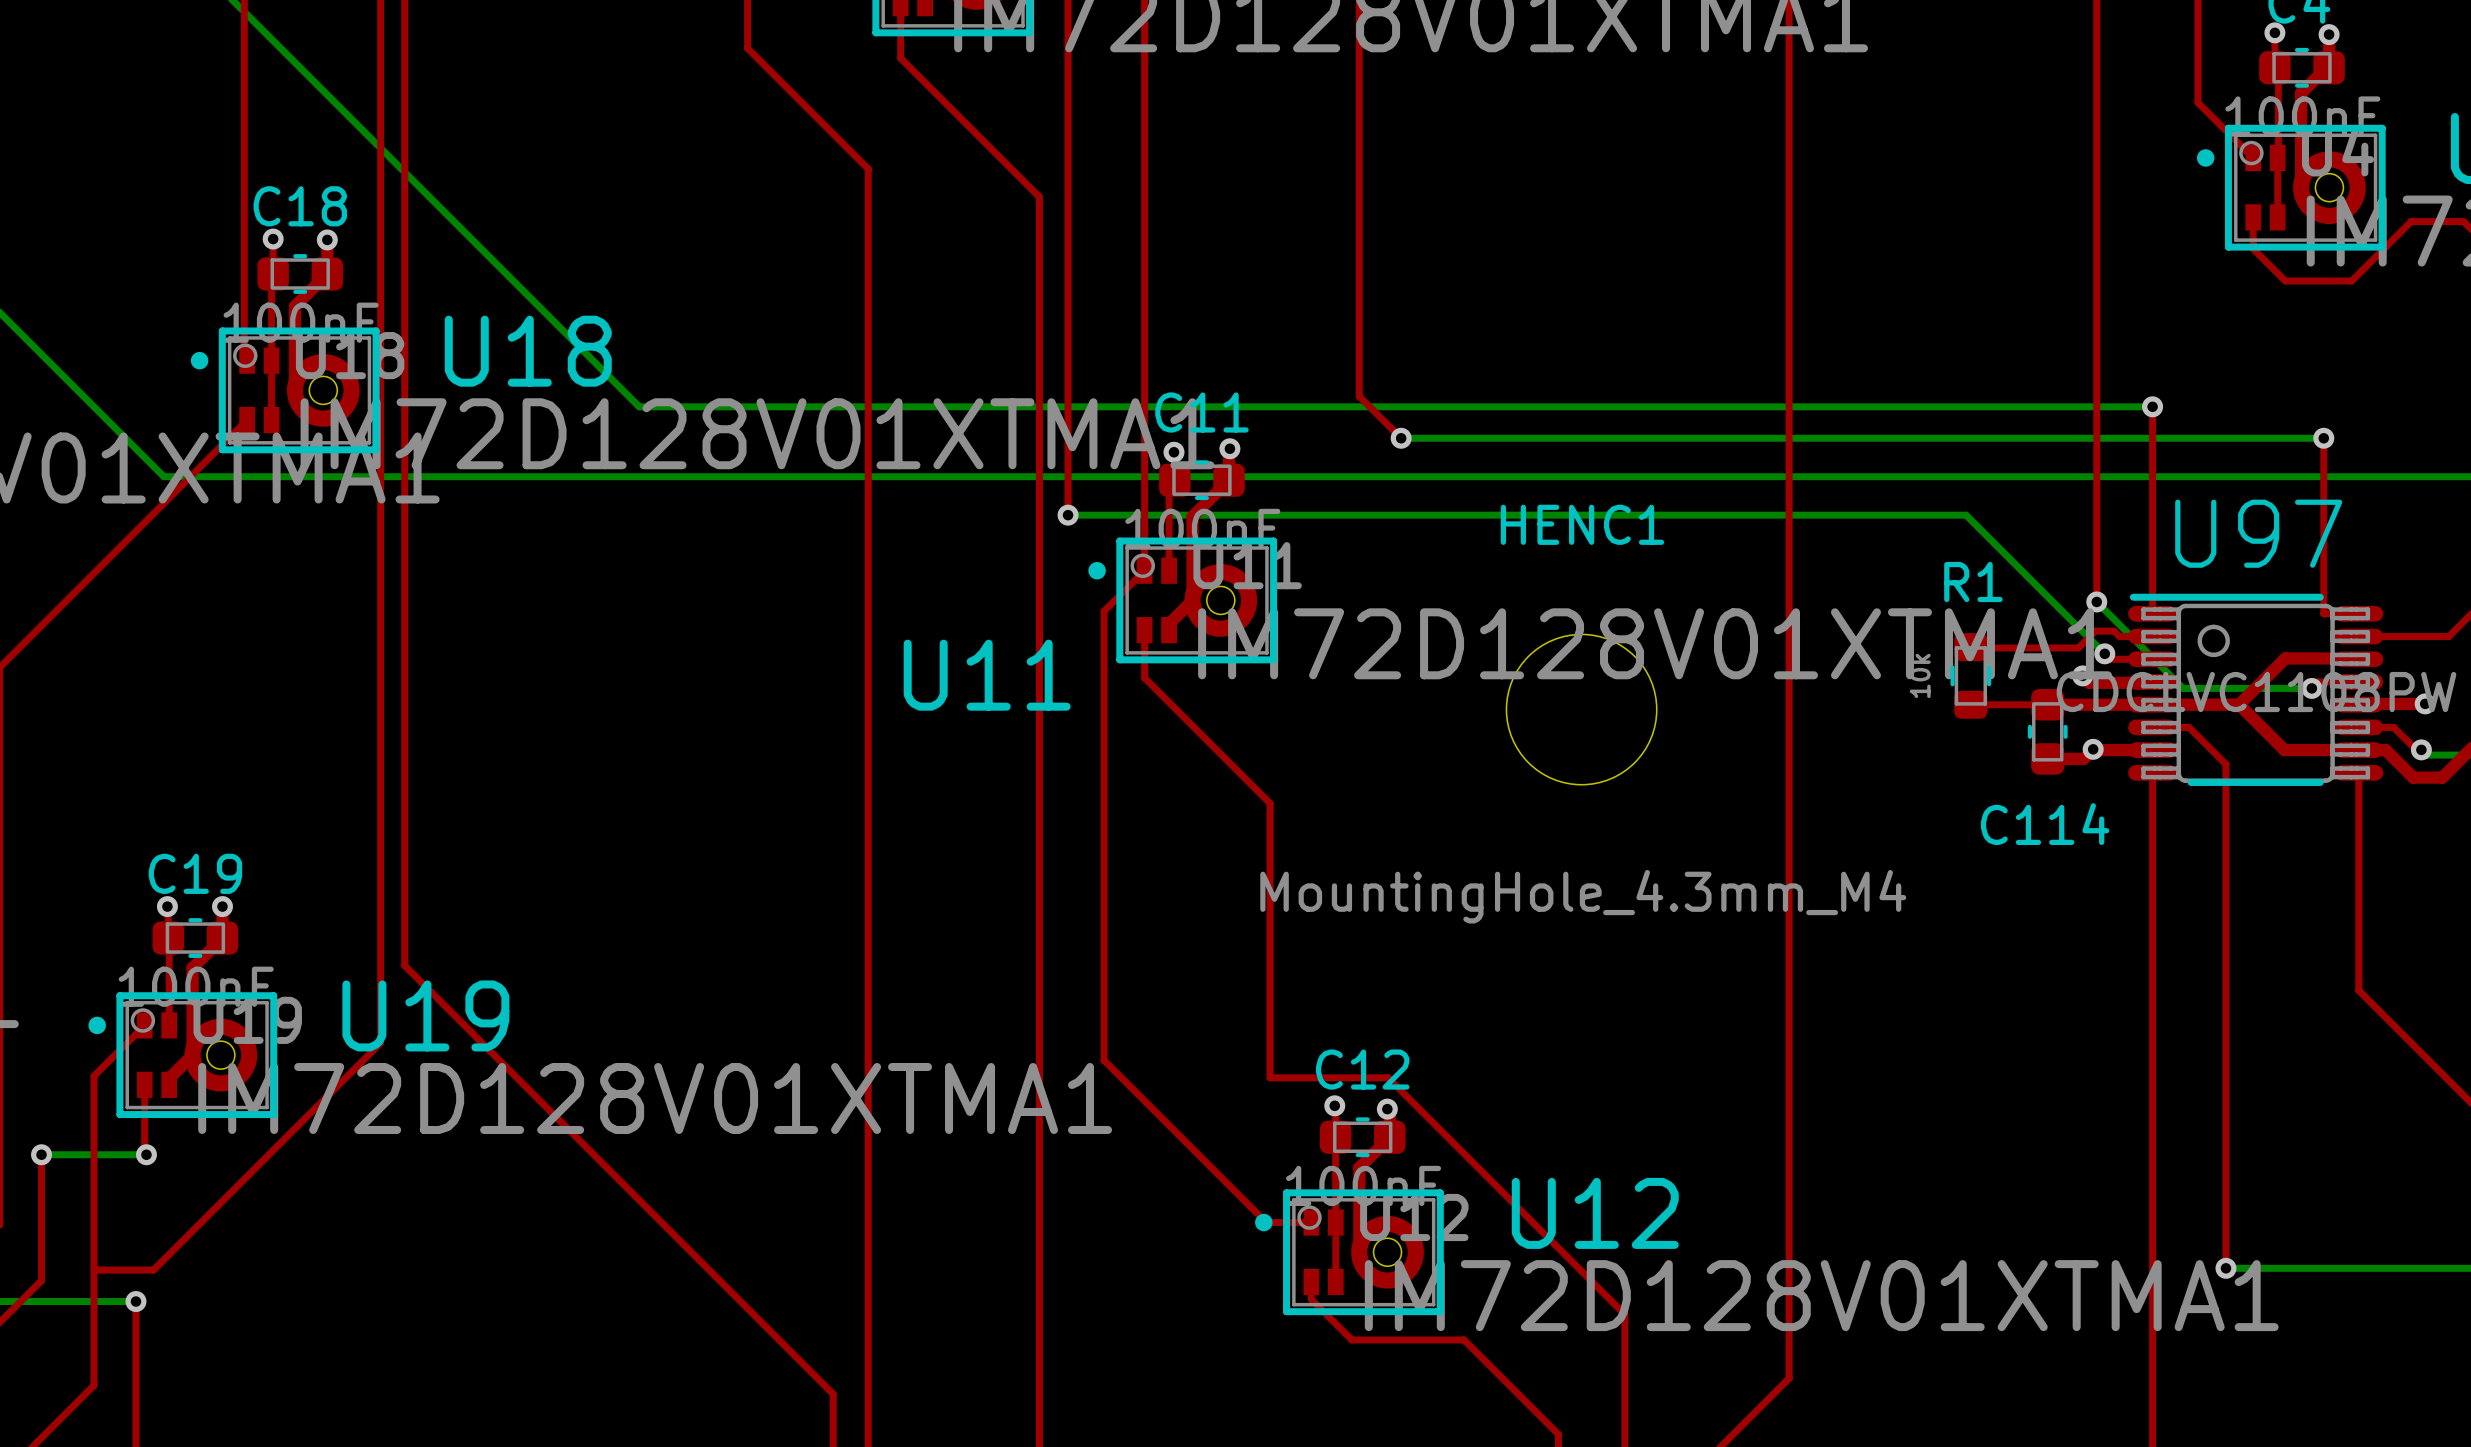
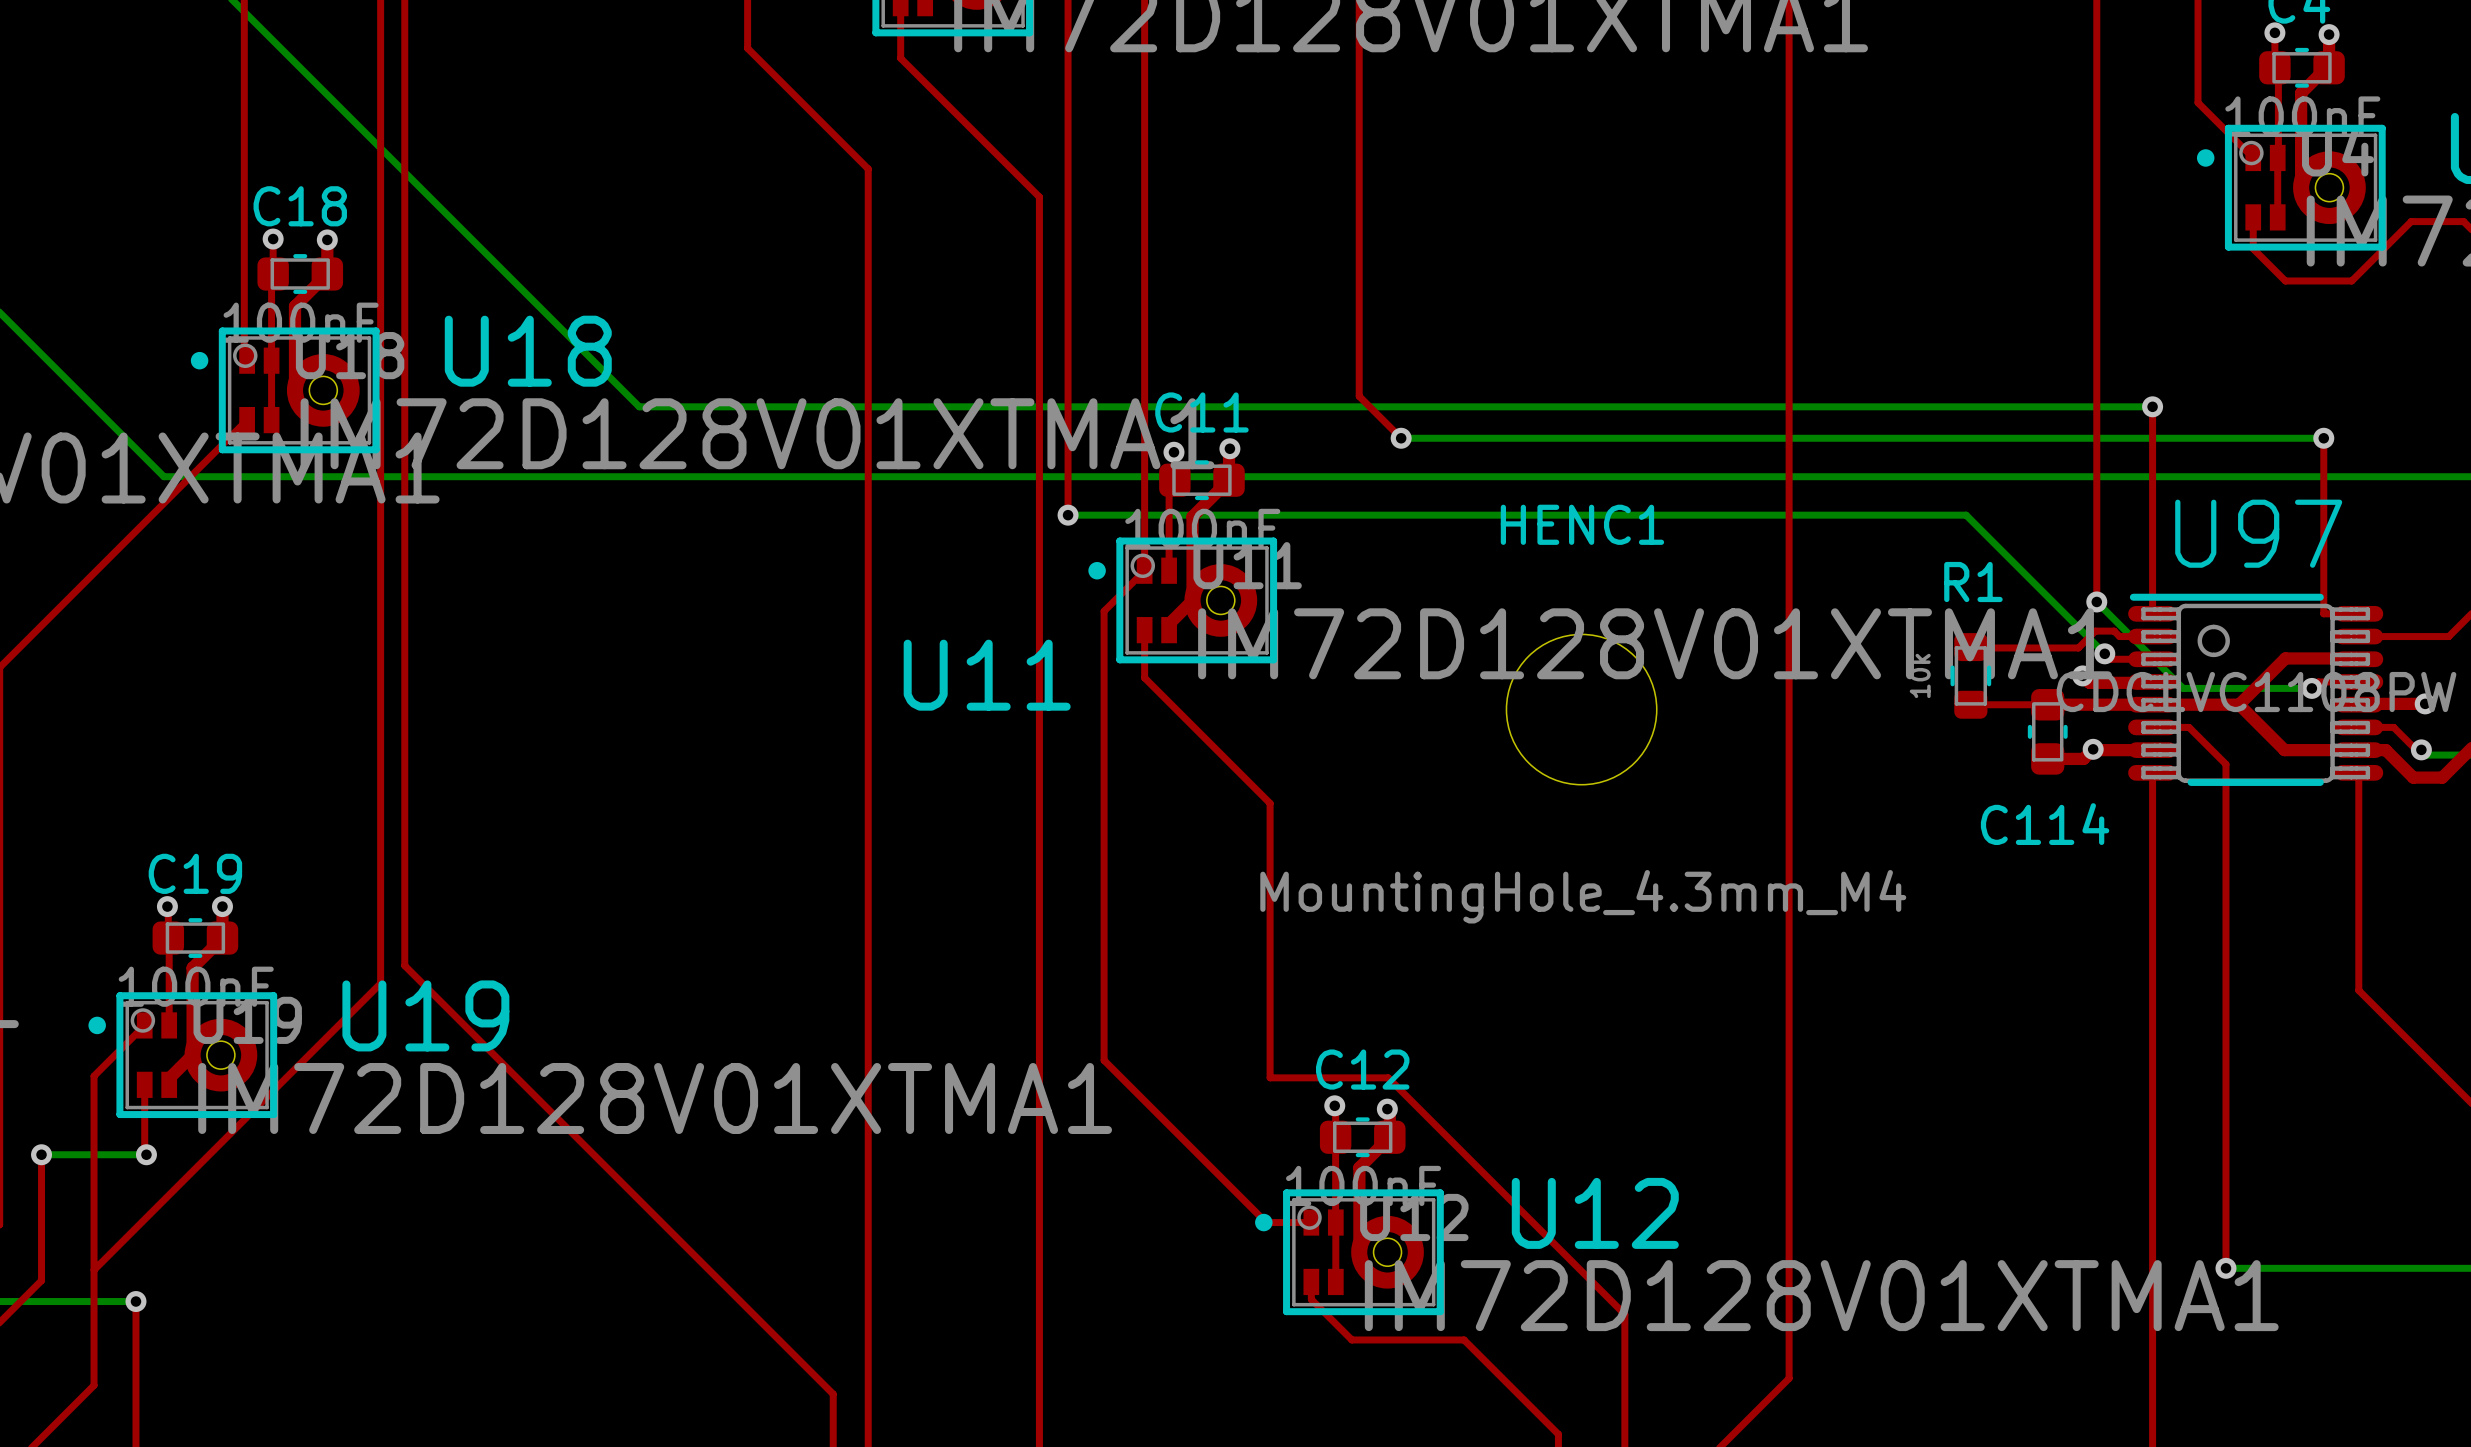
top track: (380, 983) (380, 1042) (153, 1270) (94, 1270) -> (380, 983) (94, 1270)

